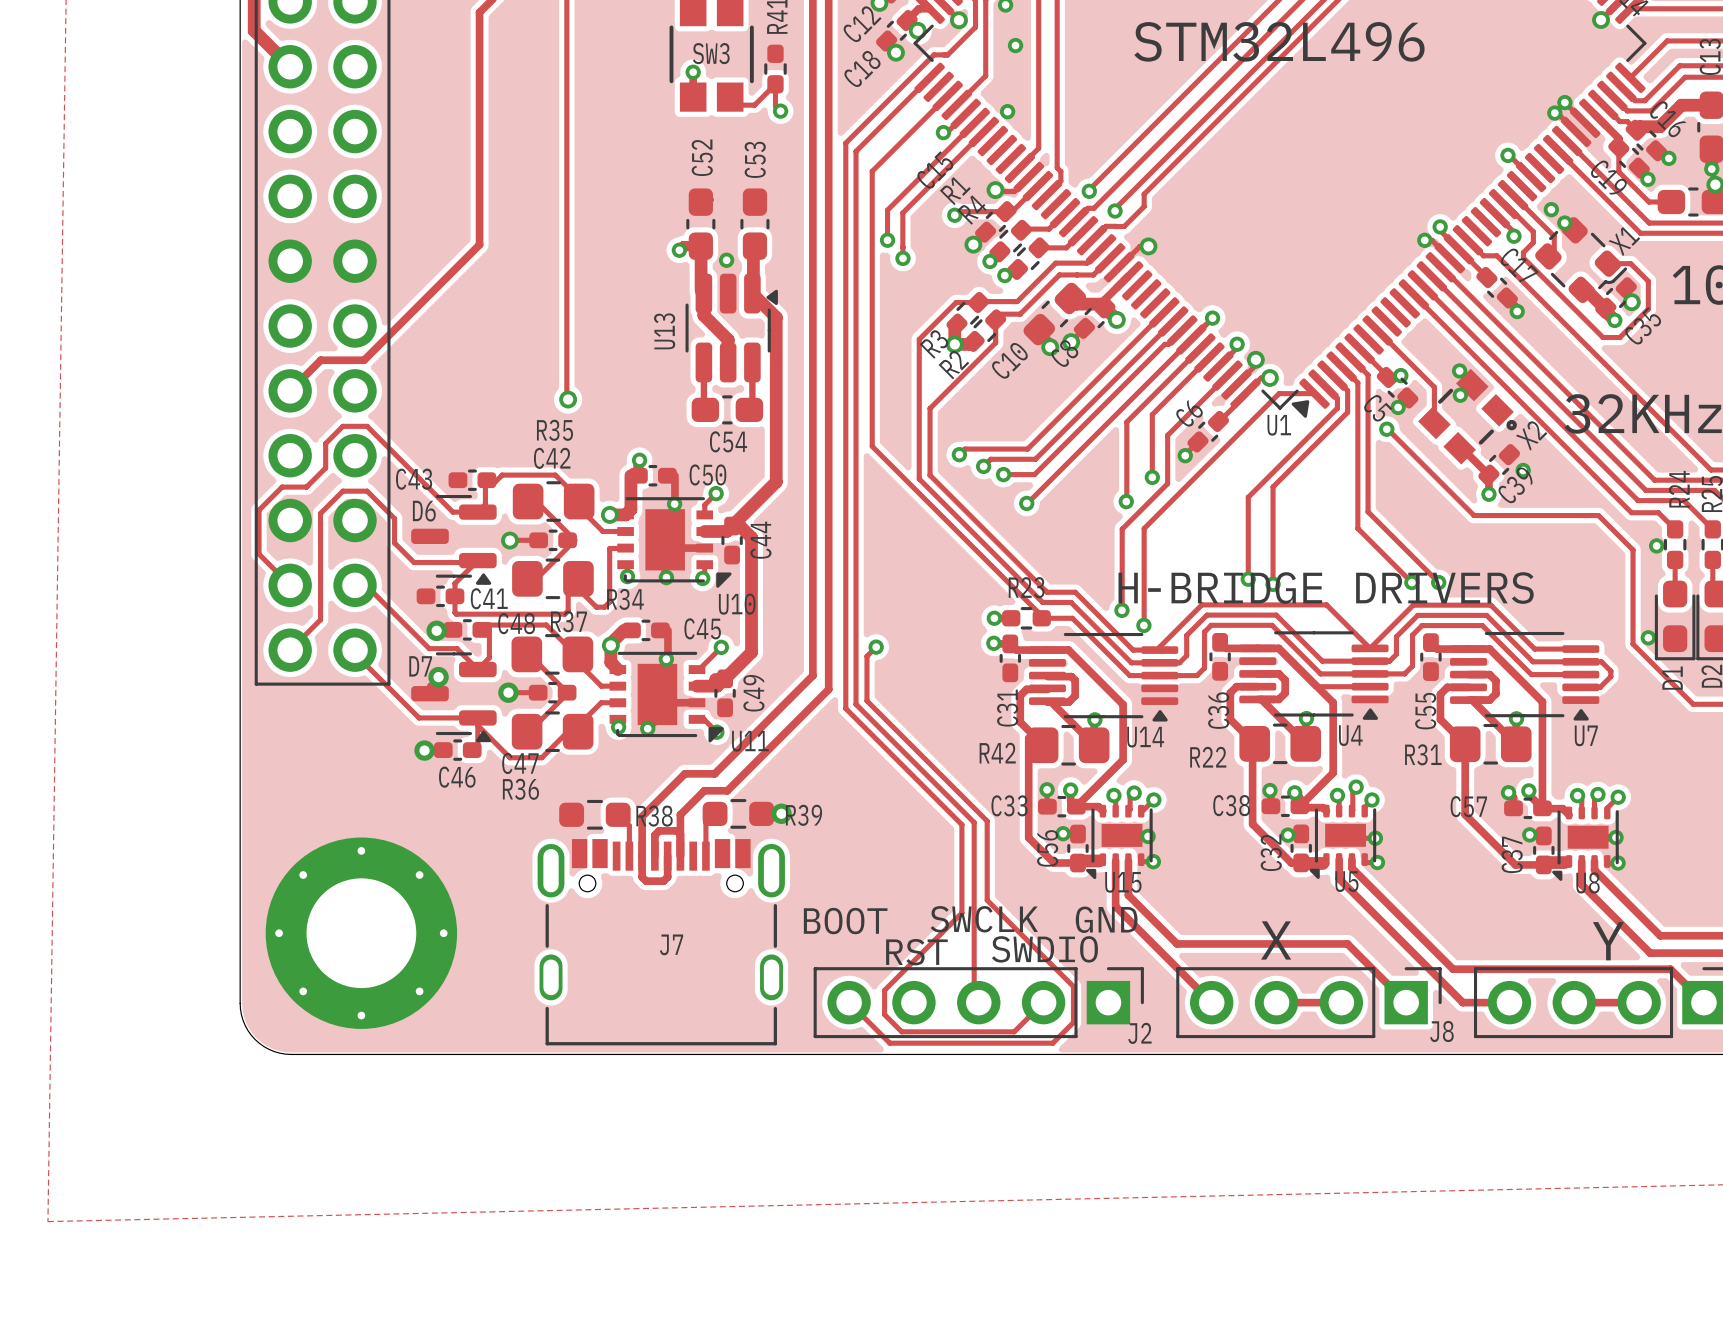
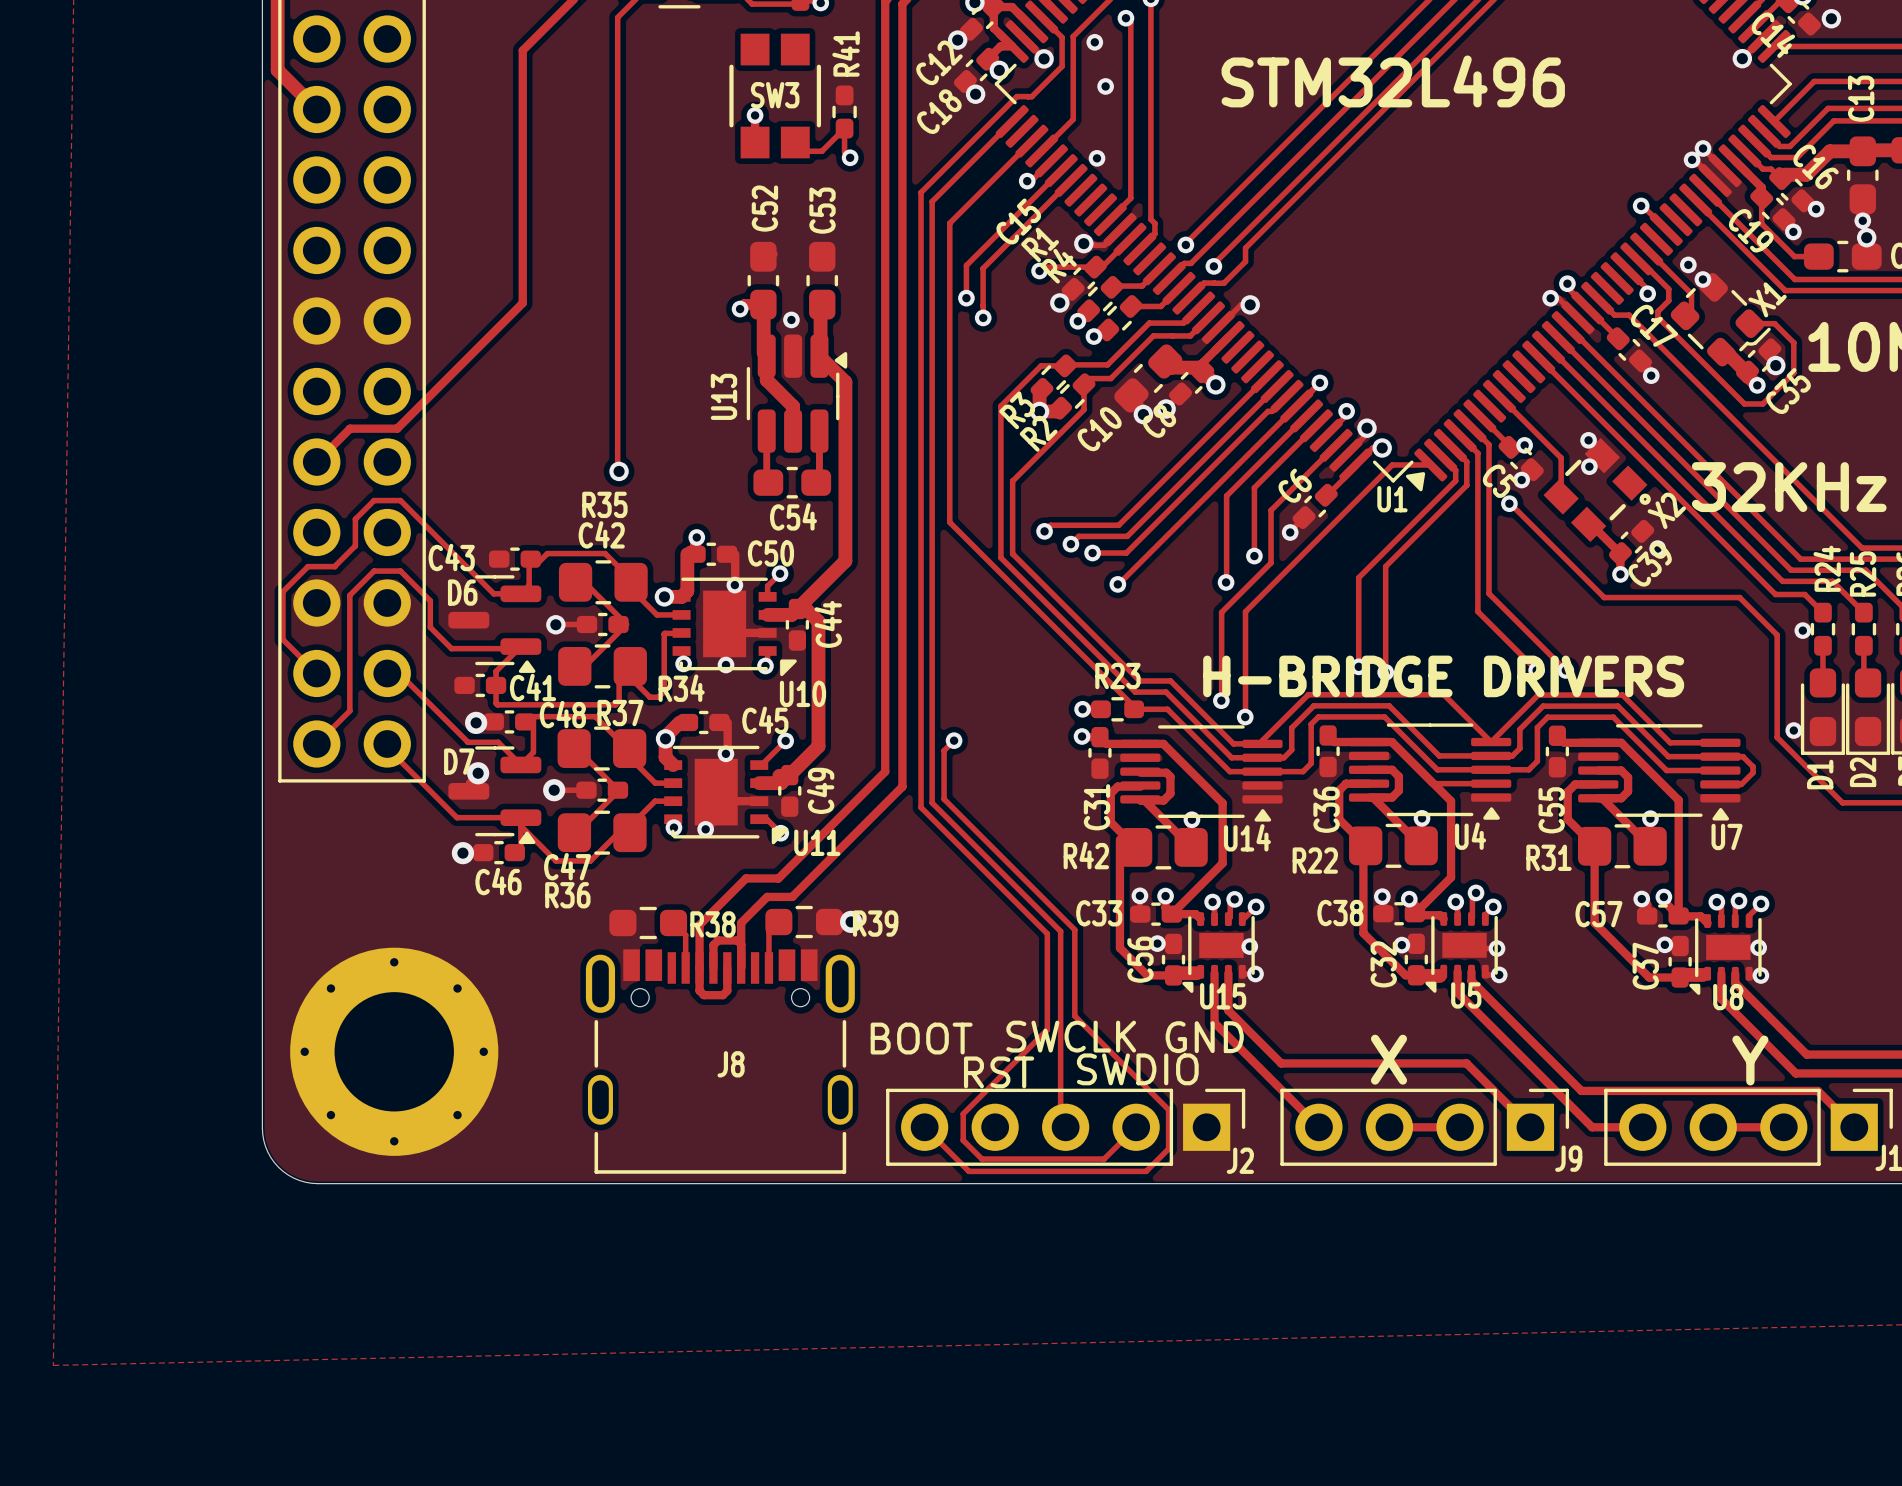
J7 name: J7 (671, 944) -> J8 (731, 1064)
J8 name: J8 (1441, 1031) -> J9 (1568, 1158)

